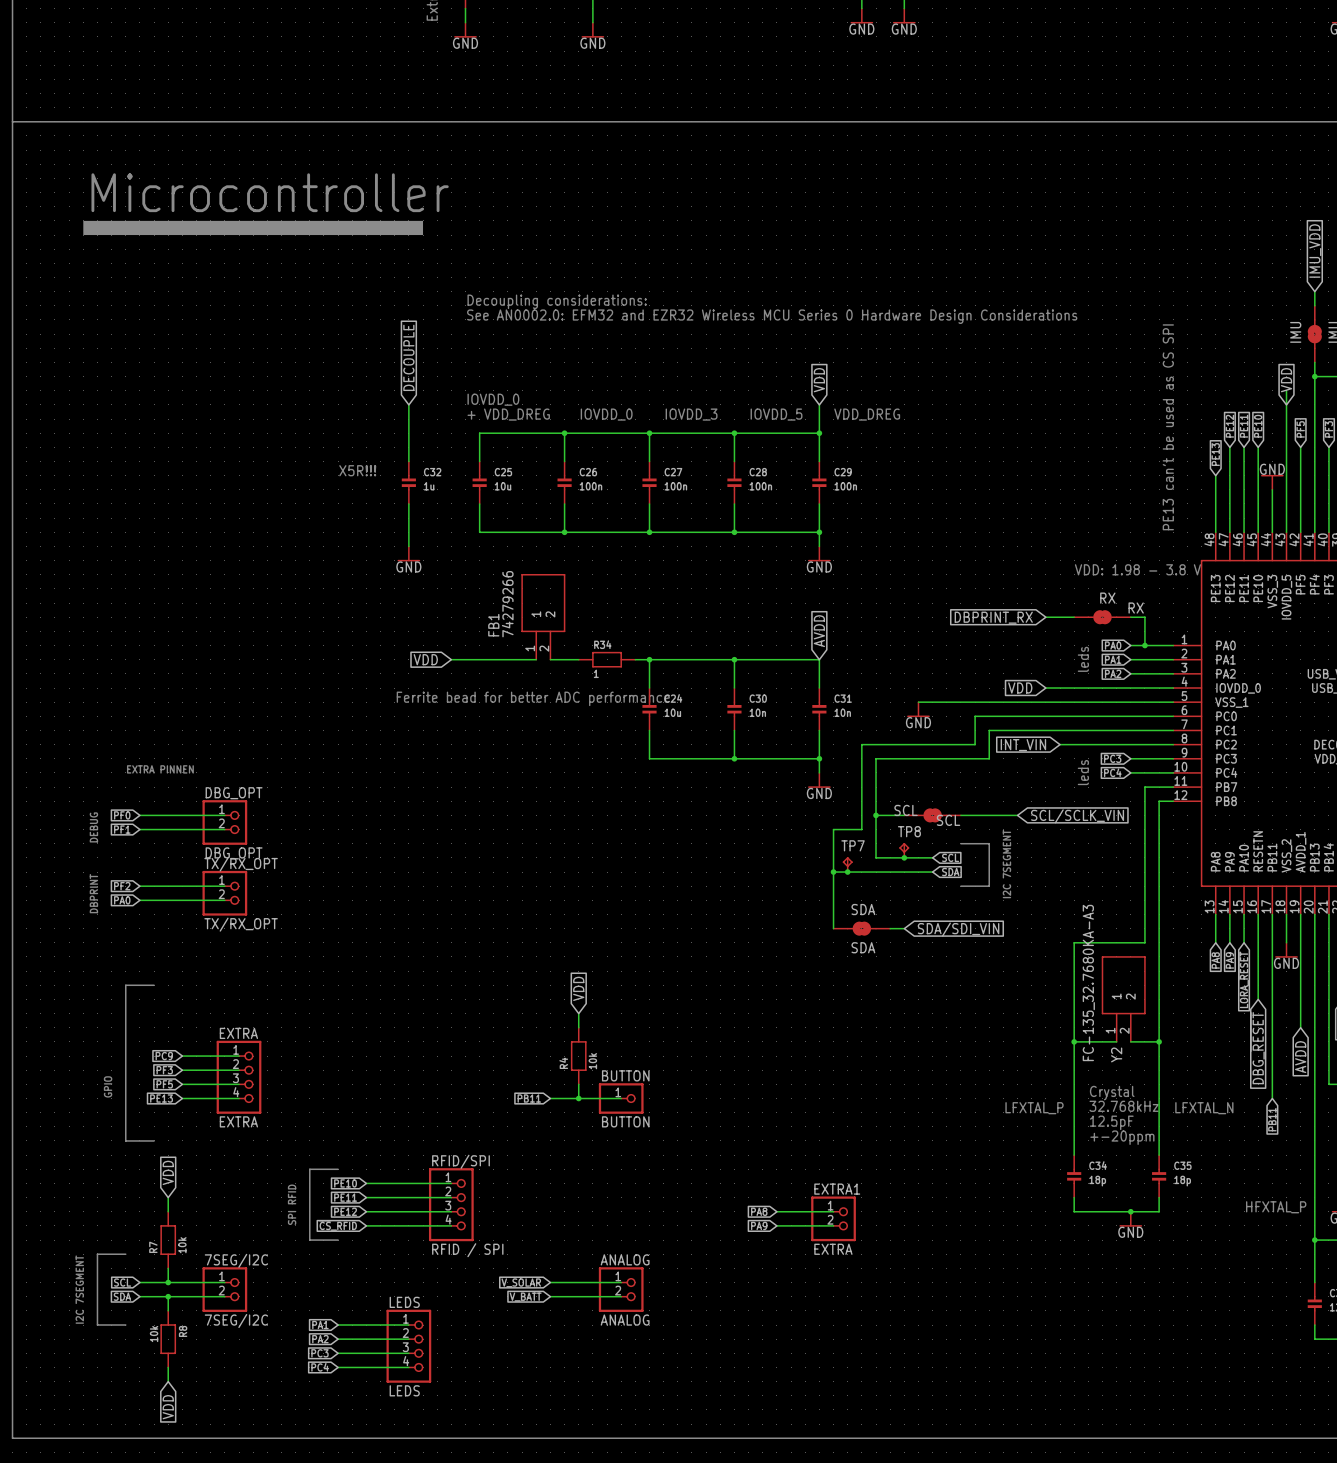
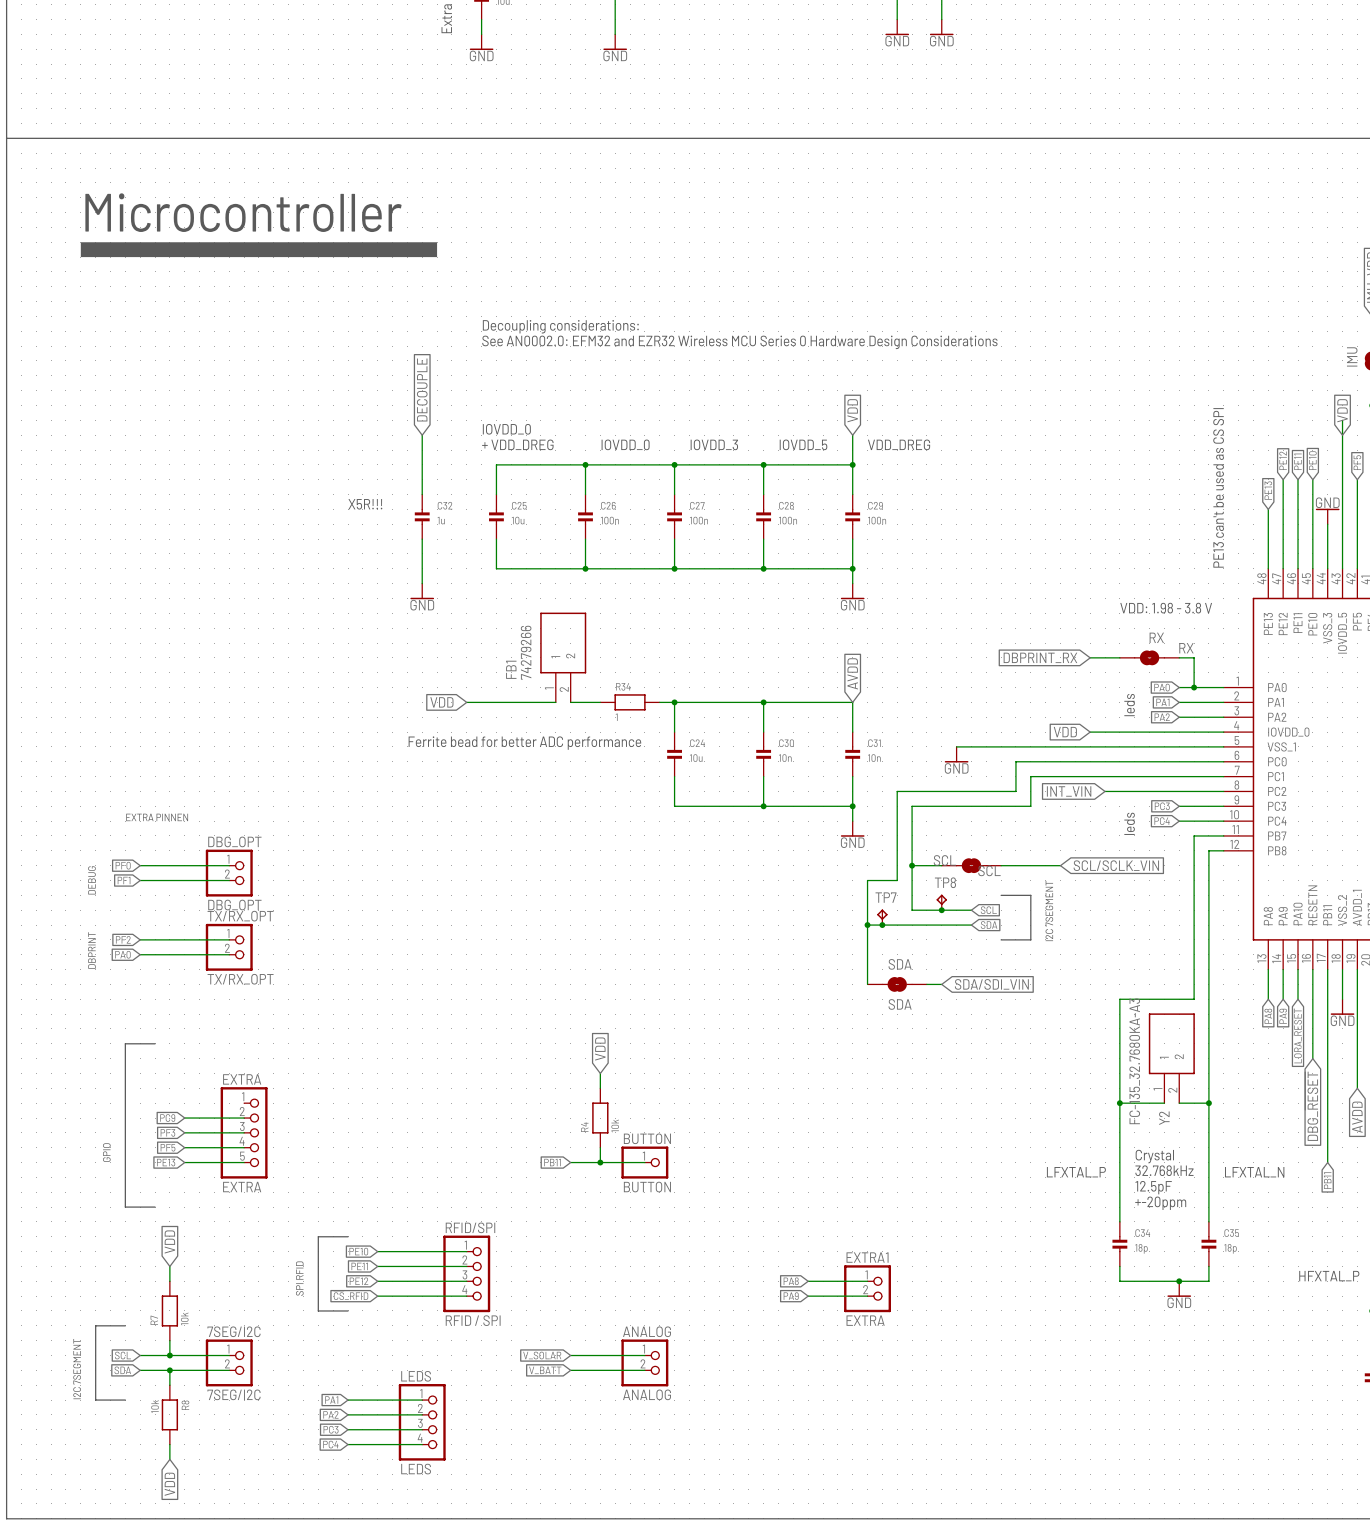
EXTRA: none -> EXTRA (244, 1132)
EXTRA: EXTRA (239, 1077) -> none

